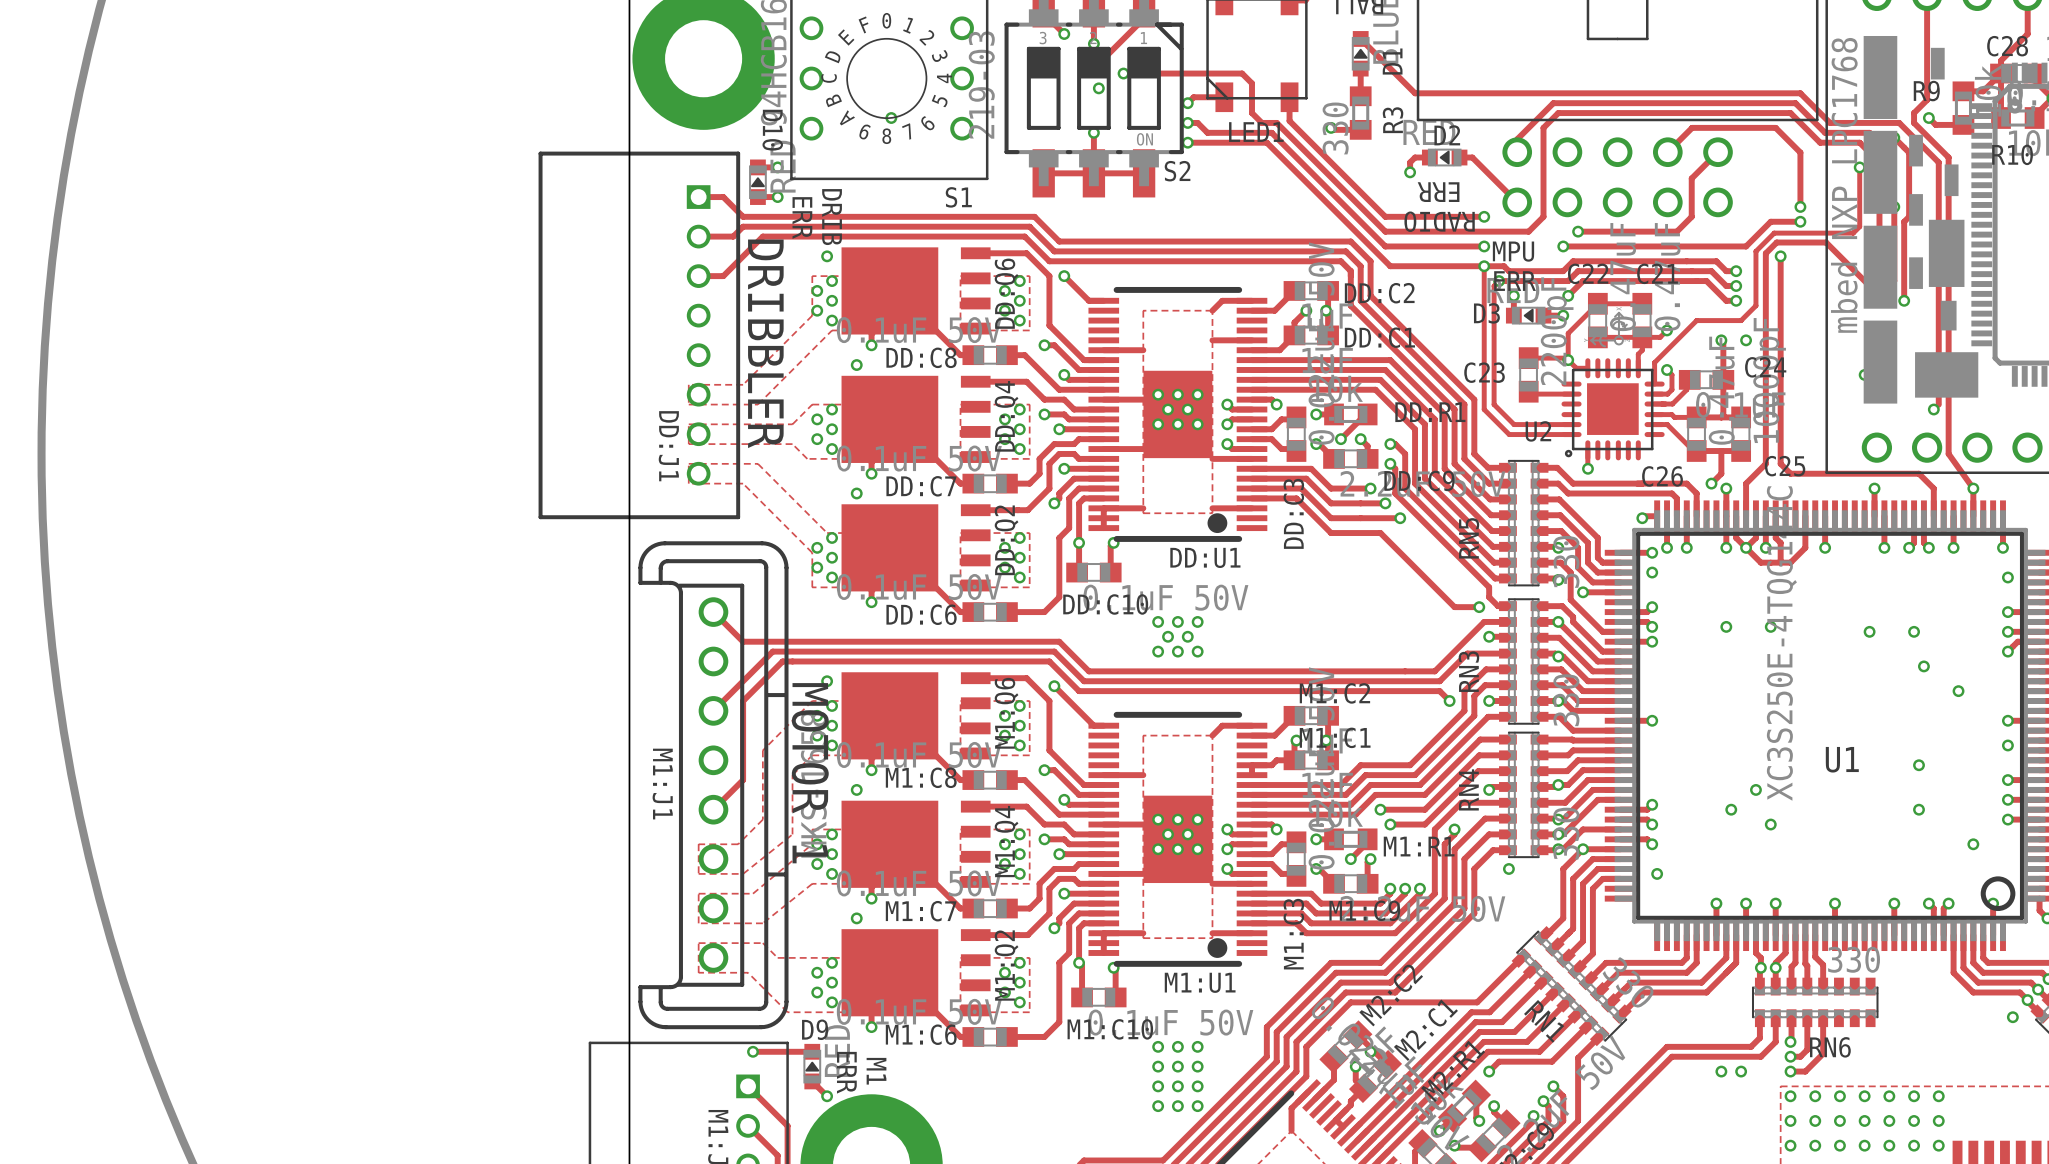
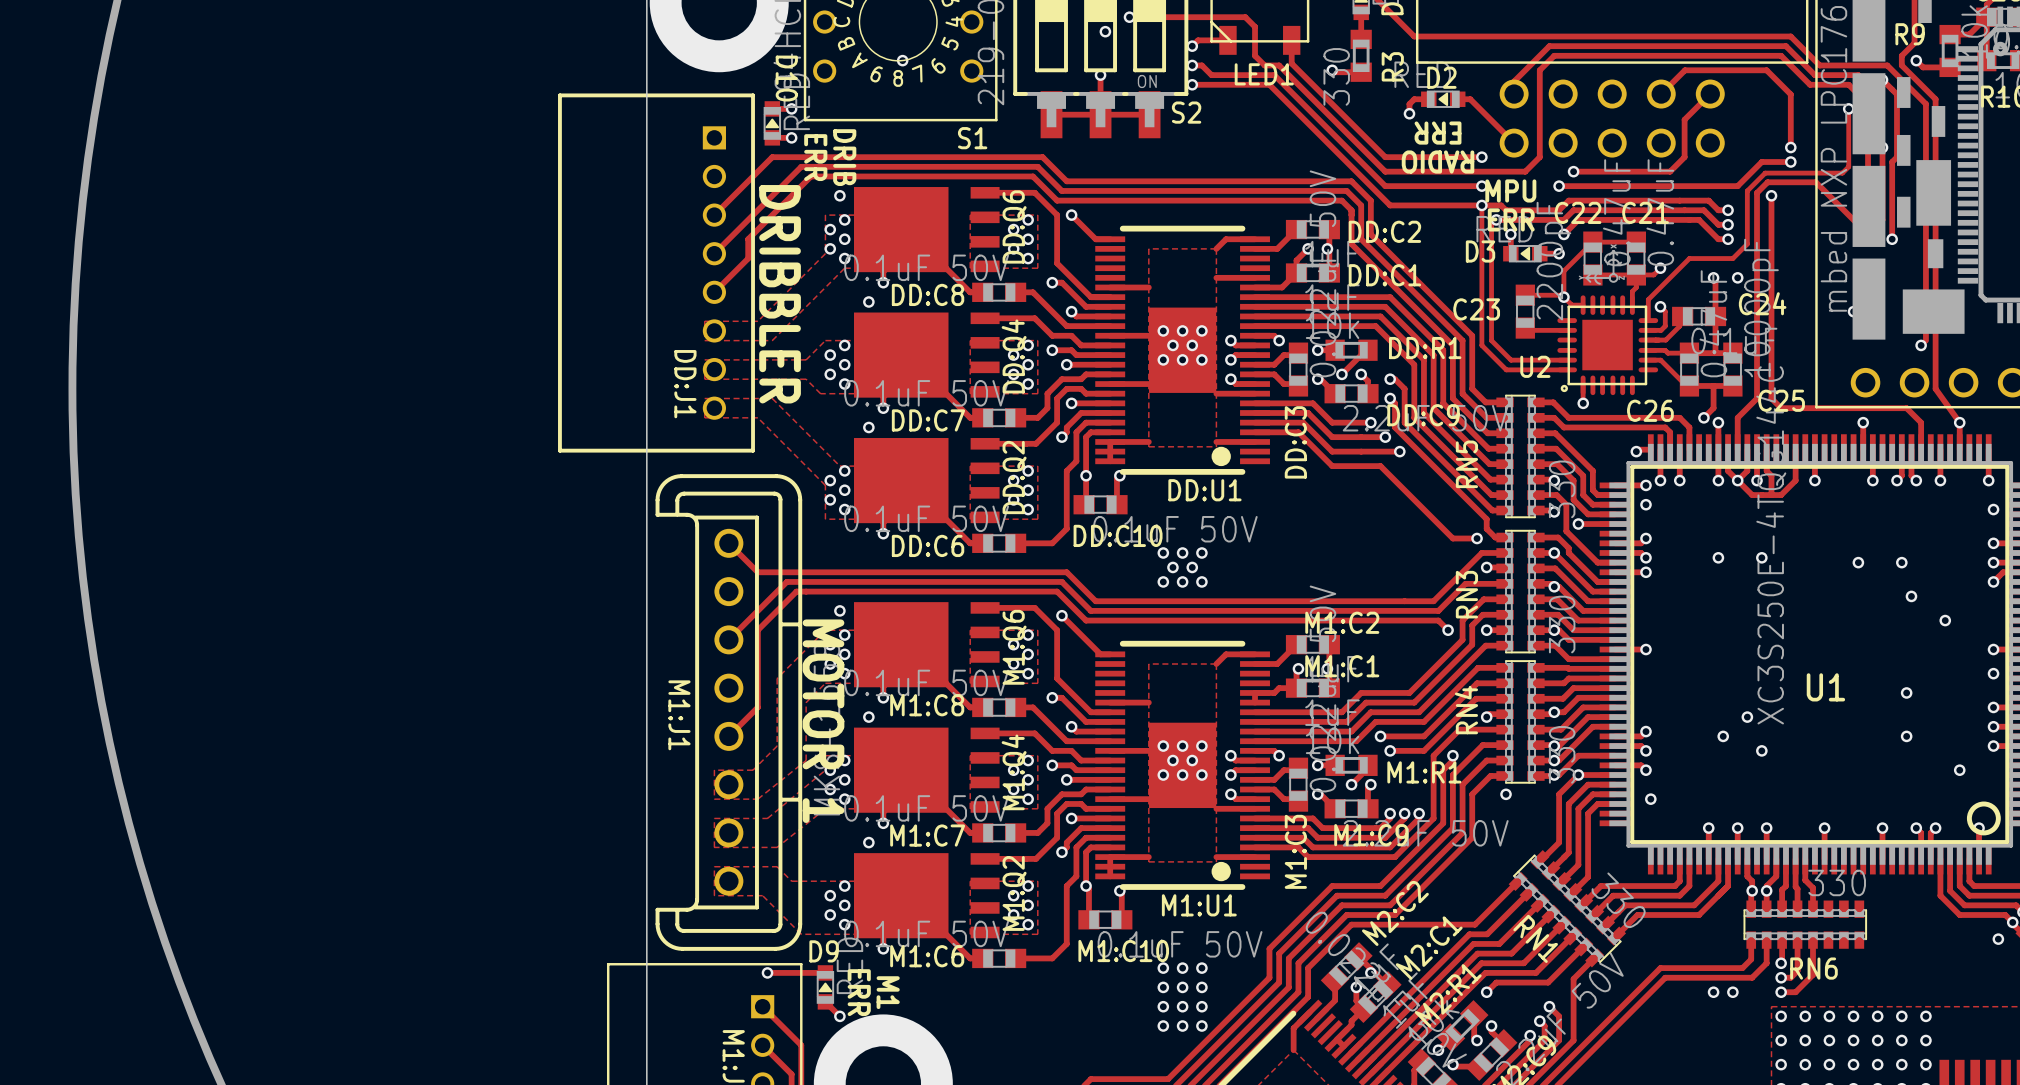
track: (698, 197) (723, 197) (743, 216) (757, 216) -> none
track: (787, 226) (743, 226) (733, 236) (698, 236) -> (801, 166) (714, 253)
track: (797, 236) (762, 236) (723, 276) (698, 276) -> (772, 157) (714, 215)
track: none -> (810, 176) (748, 239) (748, 258) (714, 292)

